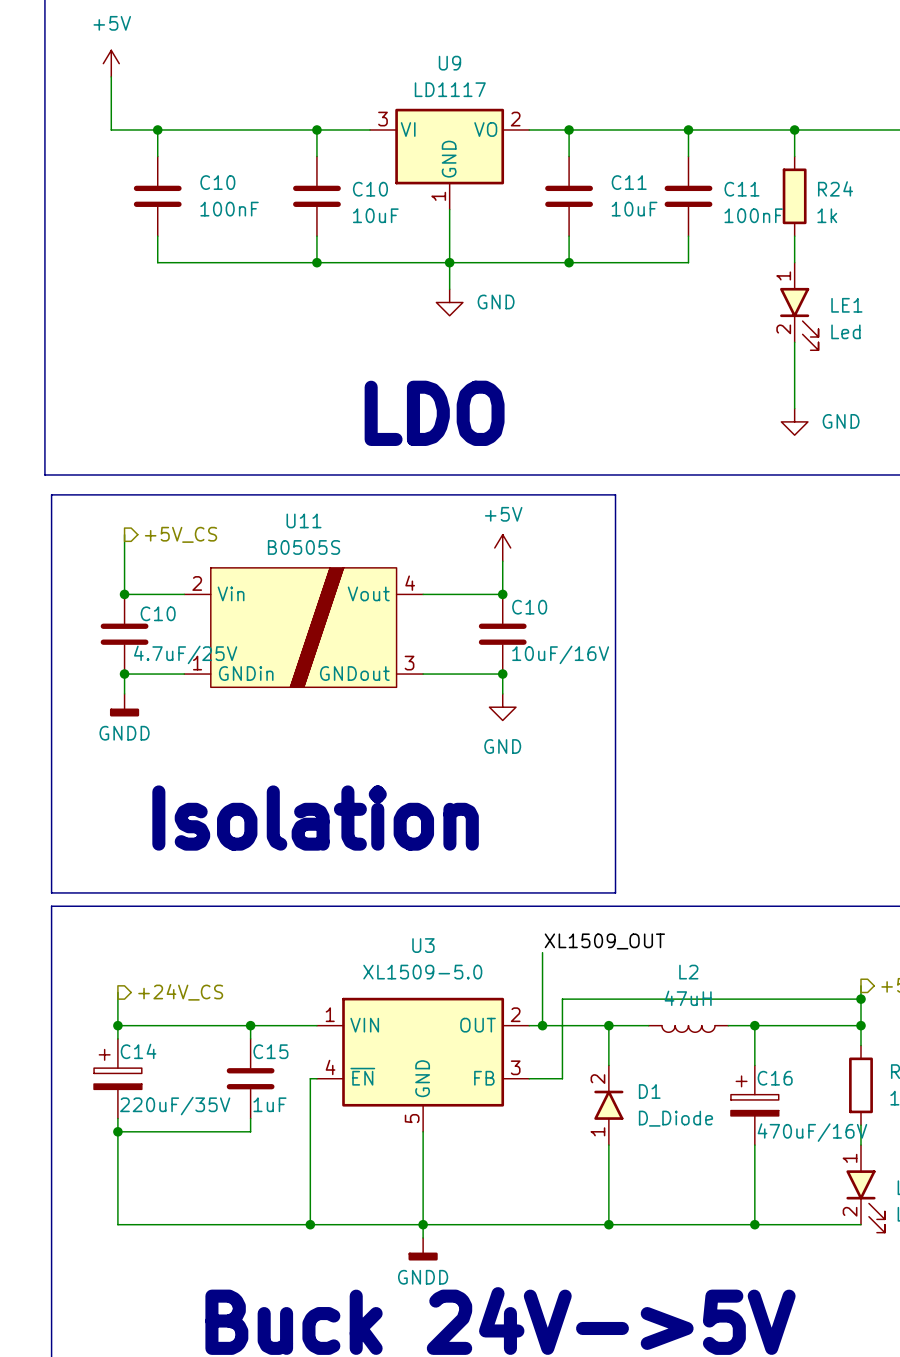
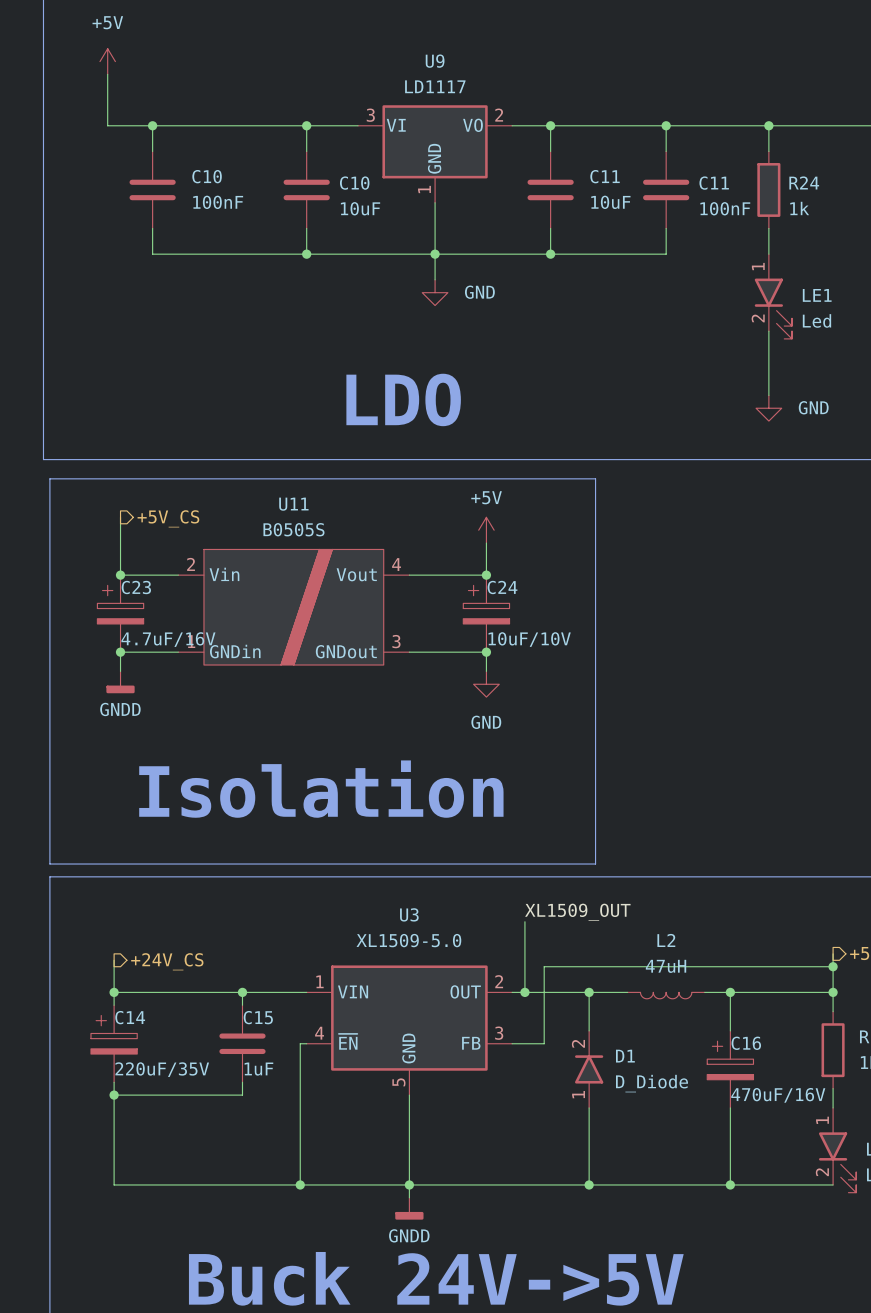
C10: 4.7uF/25V (124, 634) -> none
C23: none -> 4.7uF/16V (120, 613)
C10: 10uF/16V (502, 634) -> none
C24: none -> 10uF/10V (486, 613)

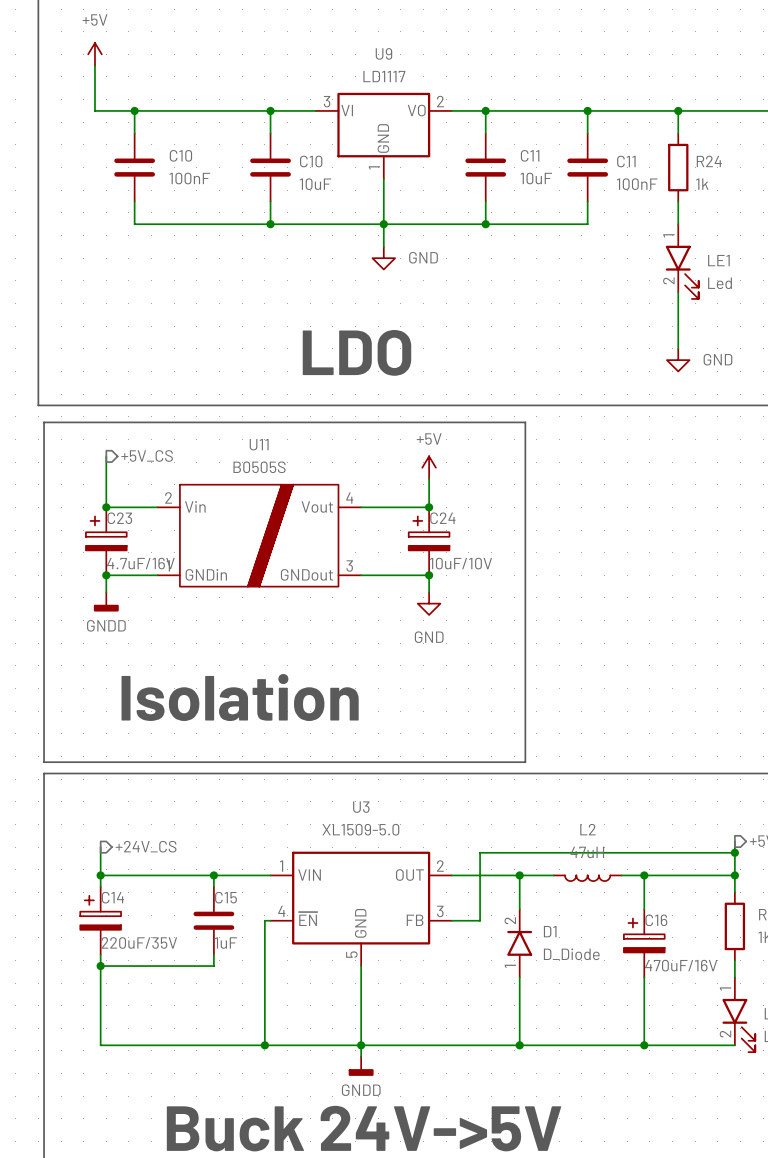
label: XL1509_OUT (577, 912) -> none
wire: (524, 921) (524, 992) -> none
junction: (524, 992) -> none

